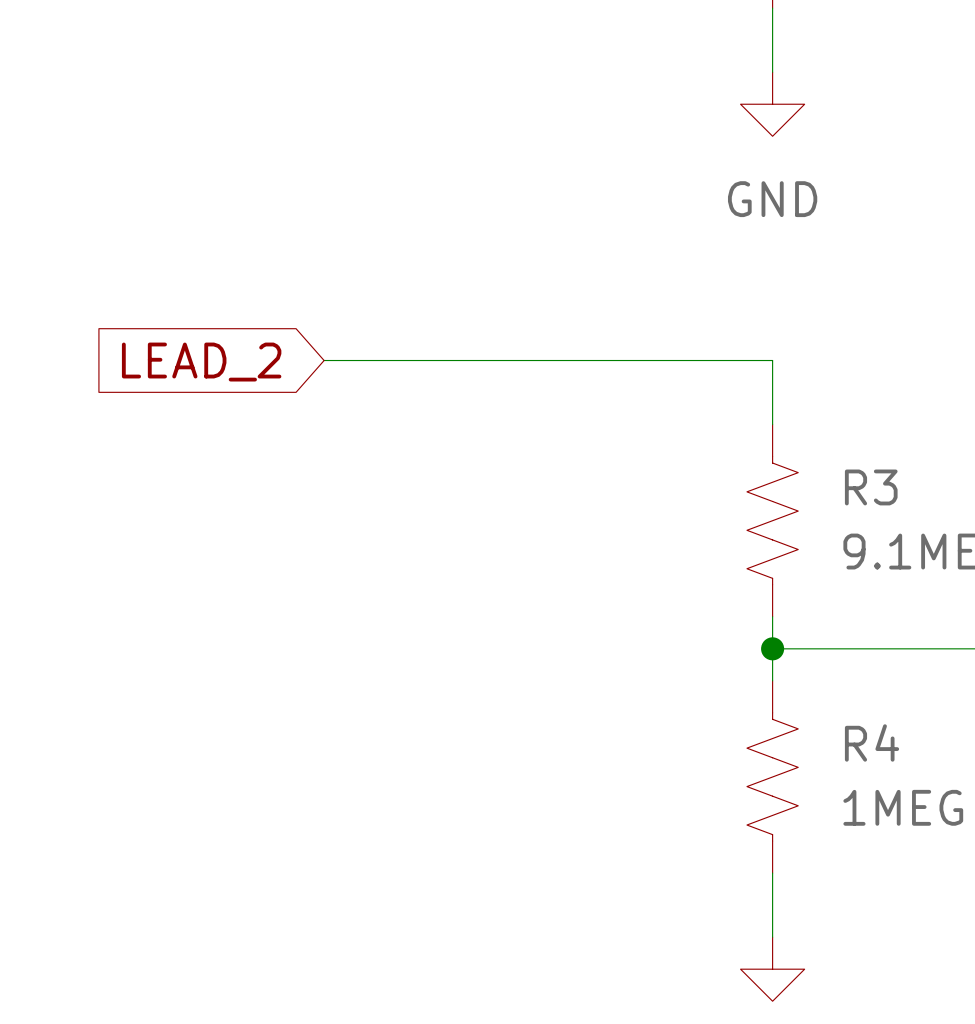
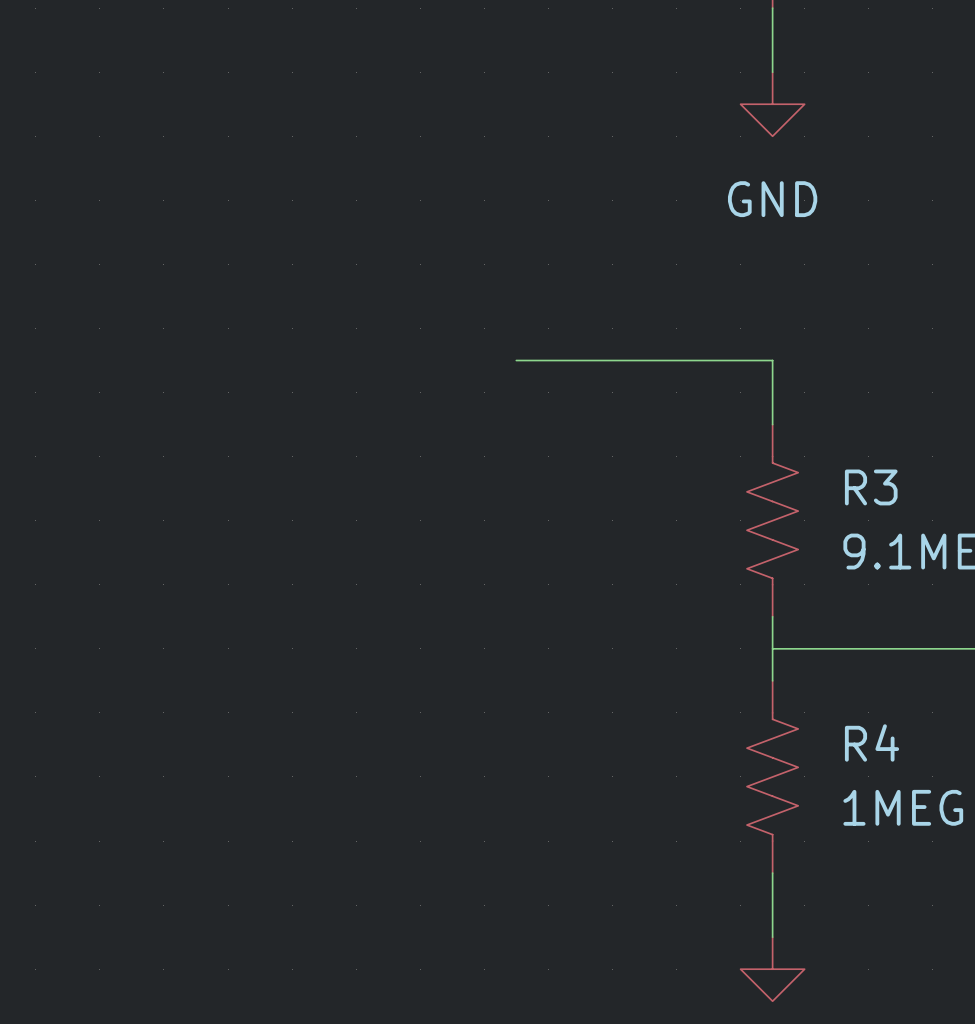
wire: (324, 360) (516, 360) -> none
global label: LEAD_2 (201, 362) -> none
junction: (772, 648) -> none

